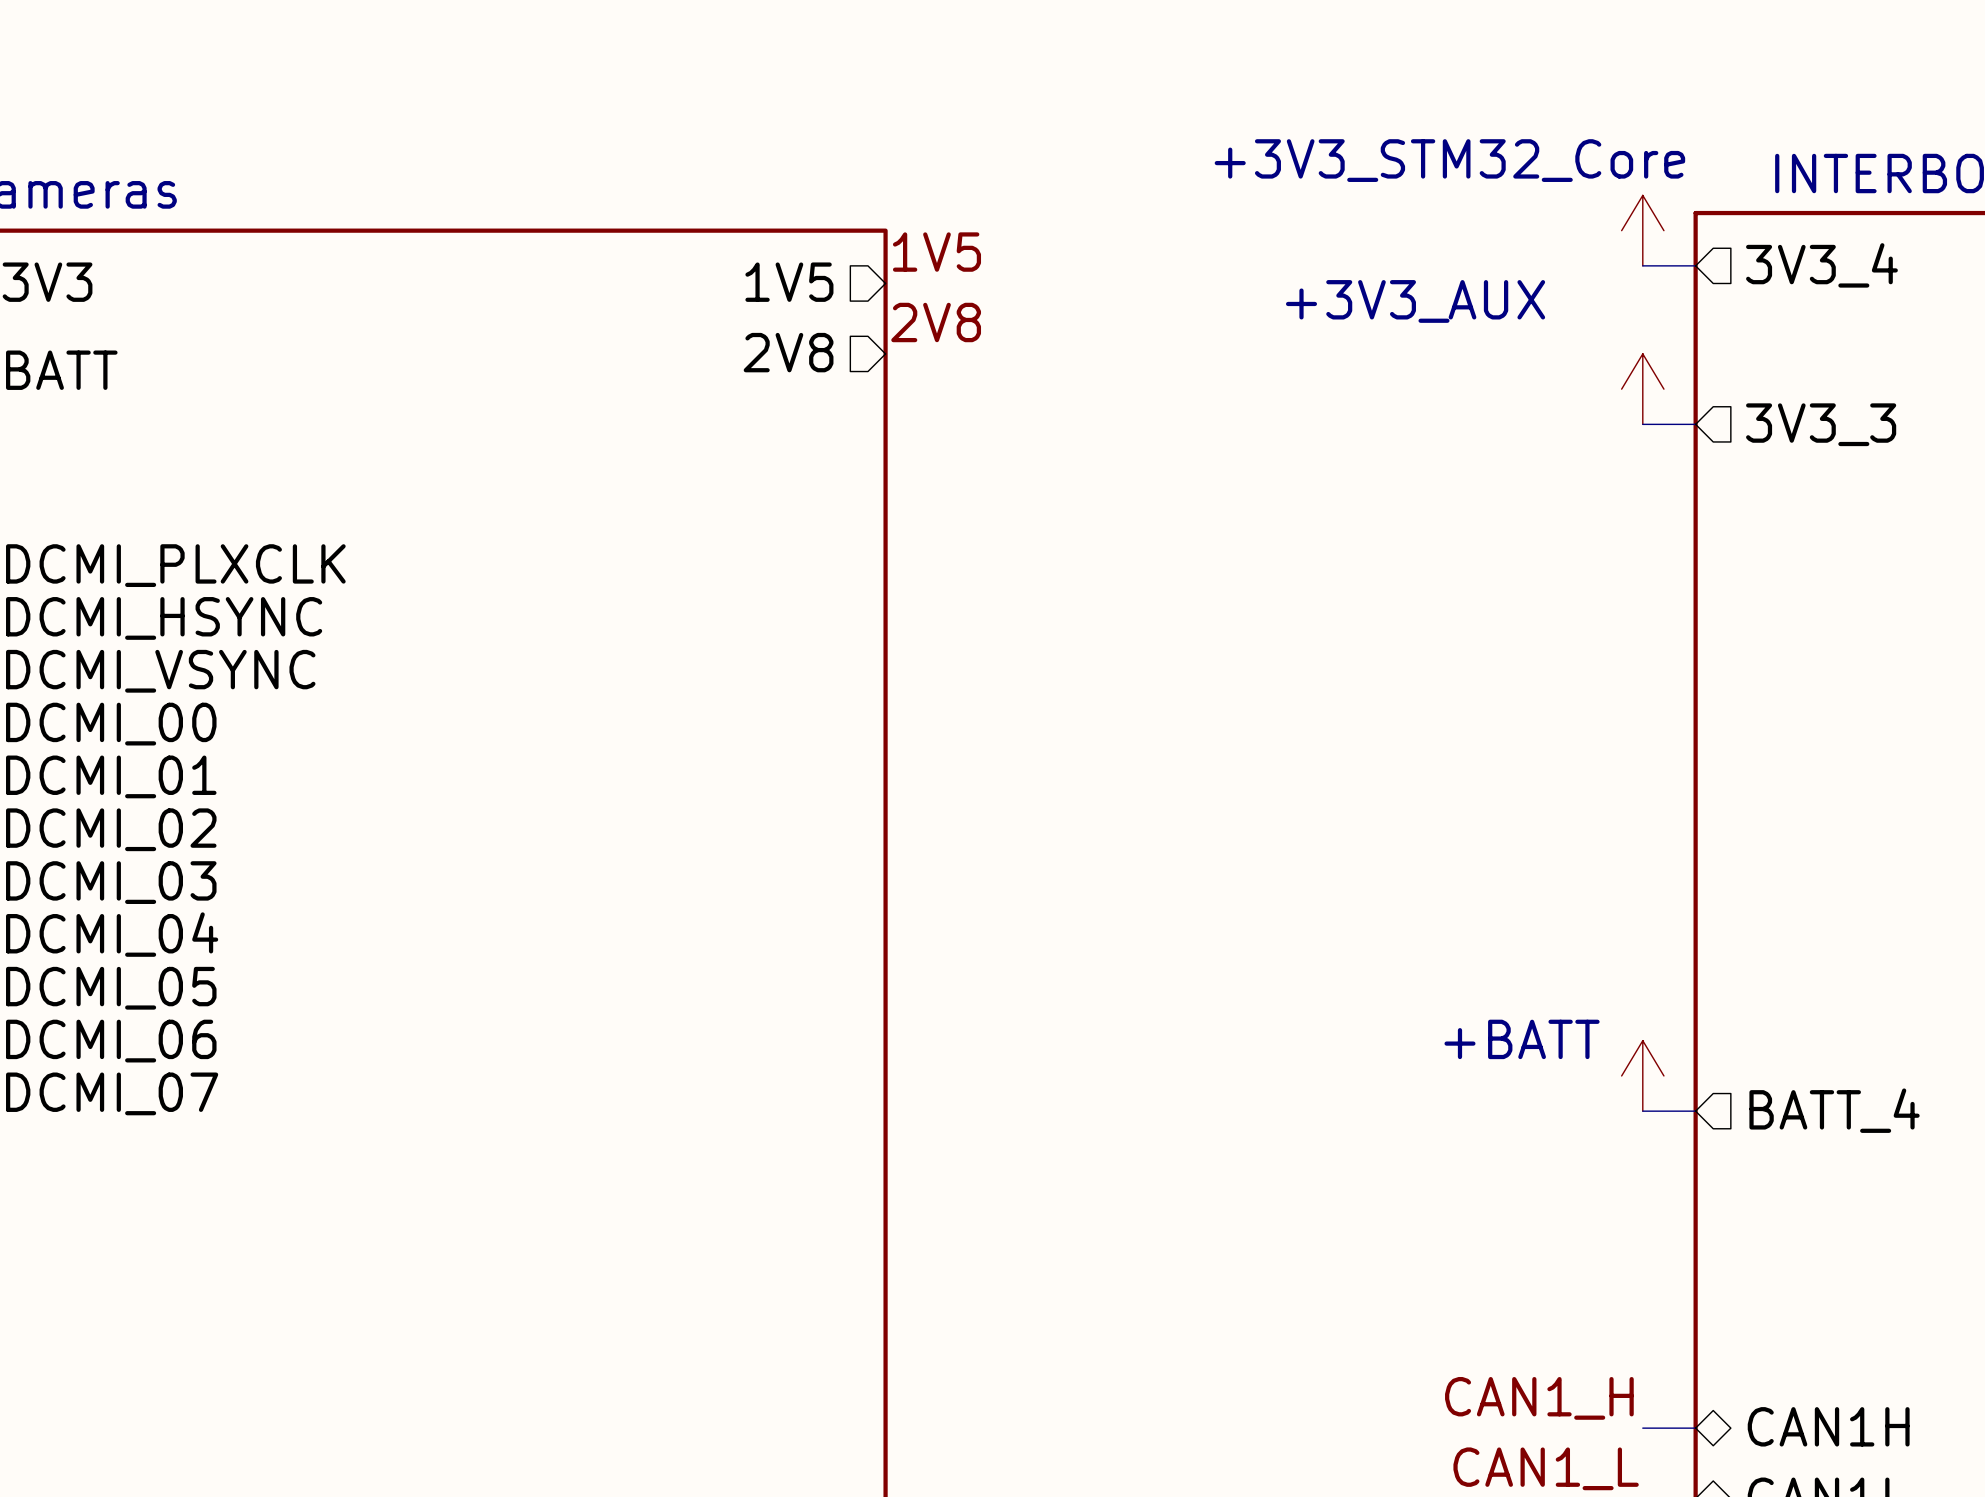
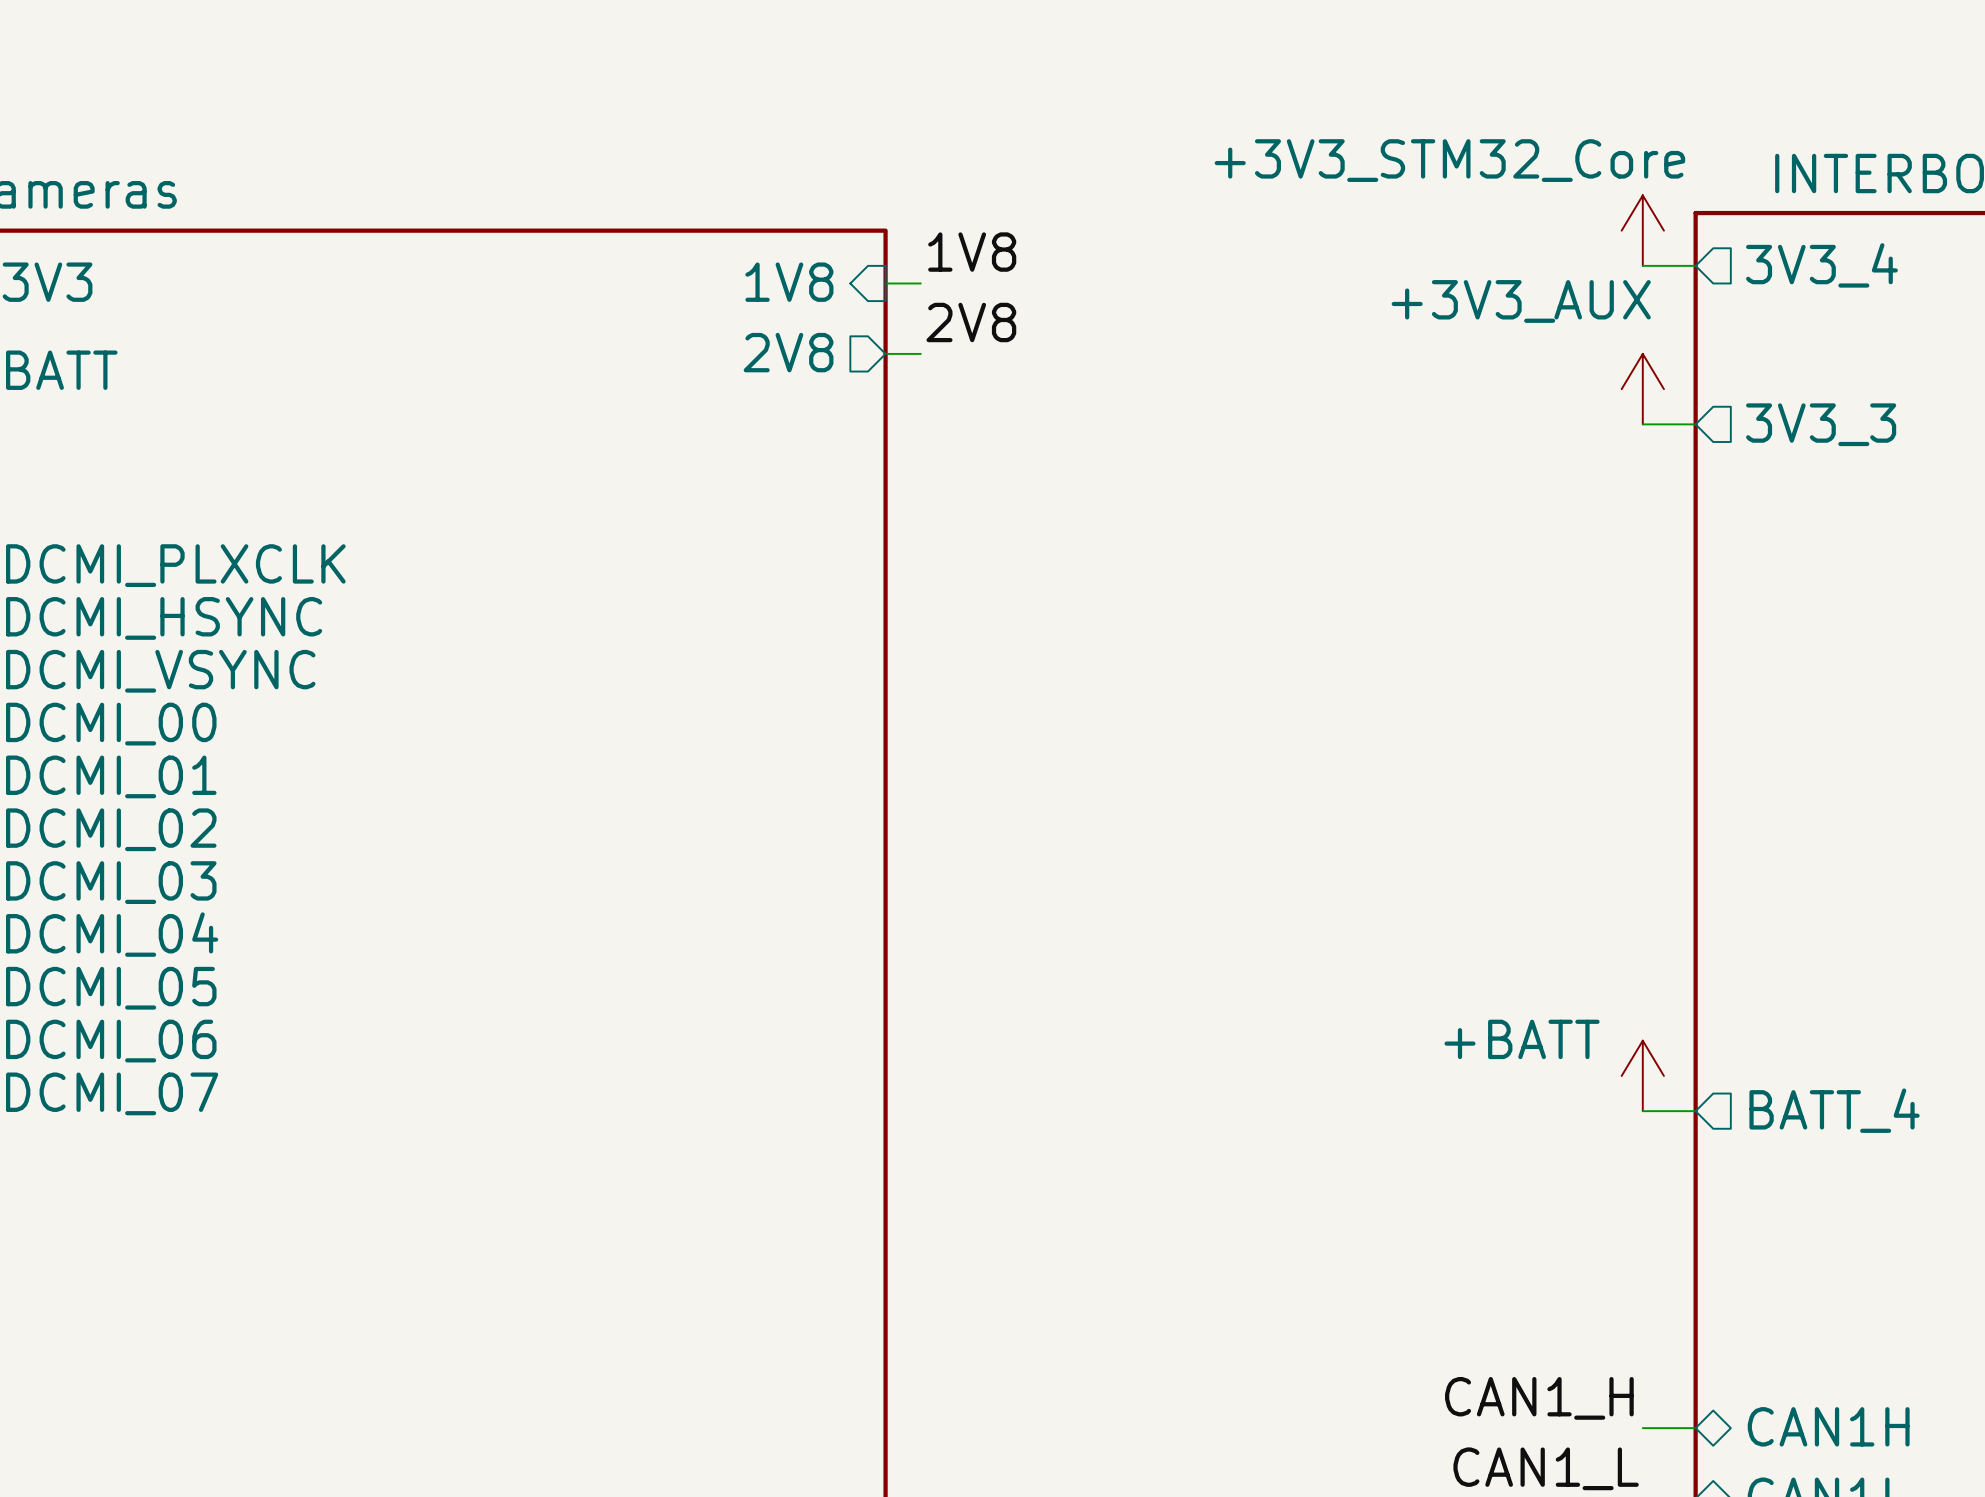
label: 1V5 (936, 252) -> 1V8 (972, 252)
sheet pin shape: output (789, 282) -> input (789, 282)
sheet pin: 1V5 (789, 282) -> 1V8 (789, 282)
wire: none -> (885, 283) (920, 283)
power symbol text position: +3V3_AUX (1415, 301) -> +3V3_AUX (1521, 301)
label position: 2V8 (936, 322) -> 2V8 (971, 322)
wire: none -> (885, 353) (920, 353)

